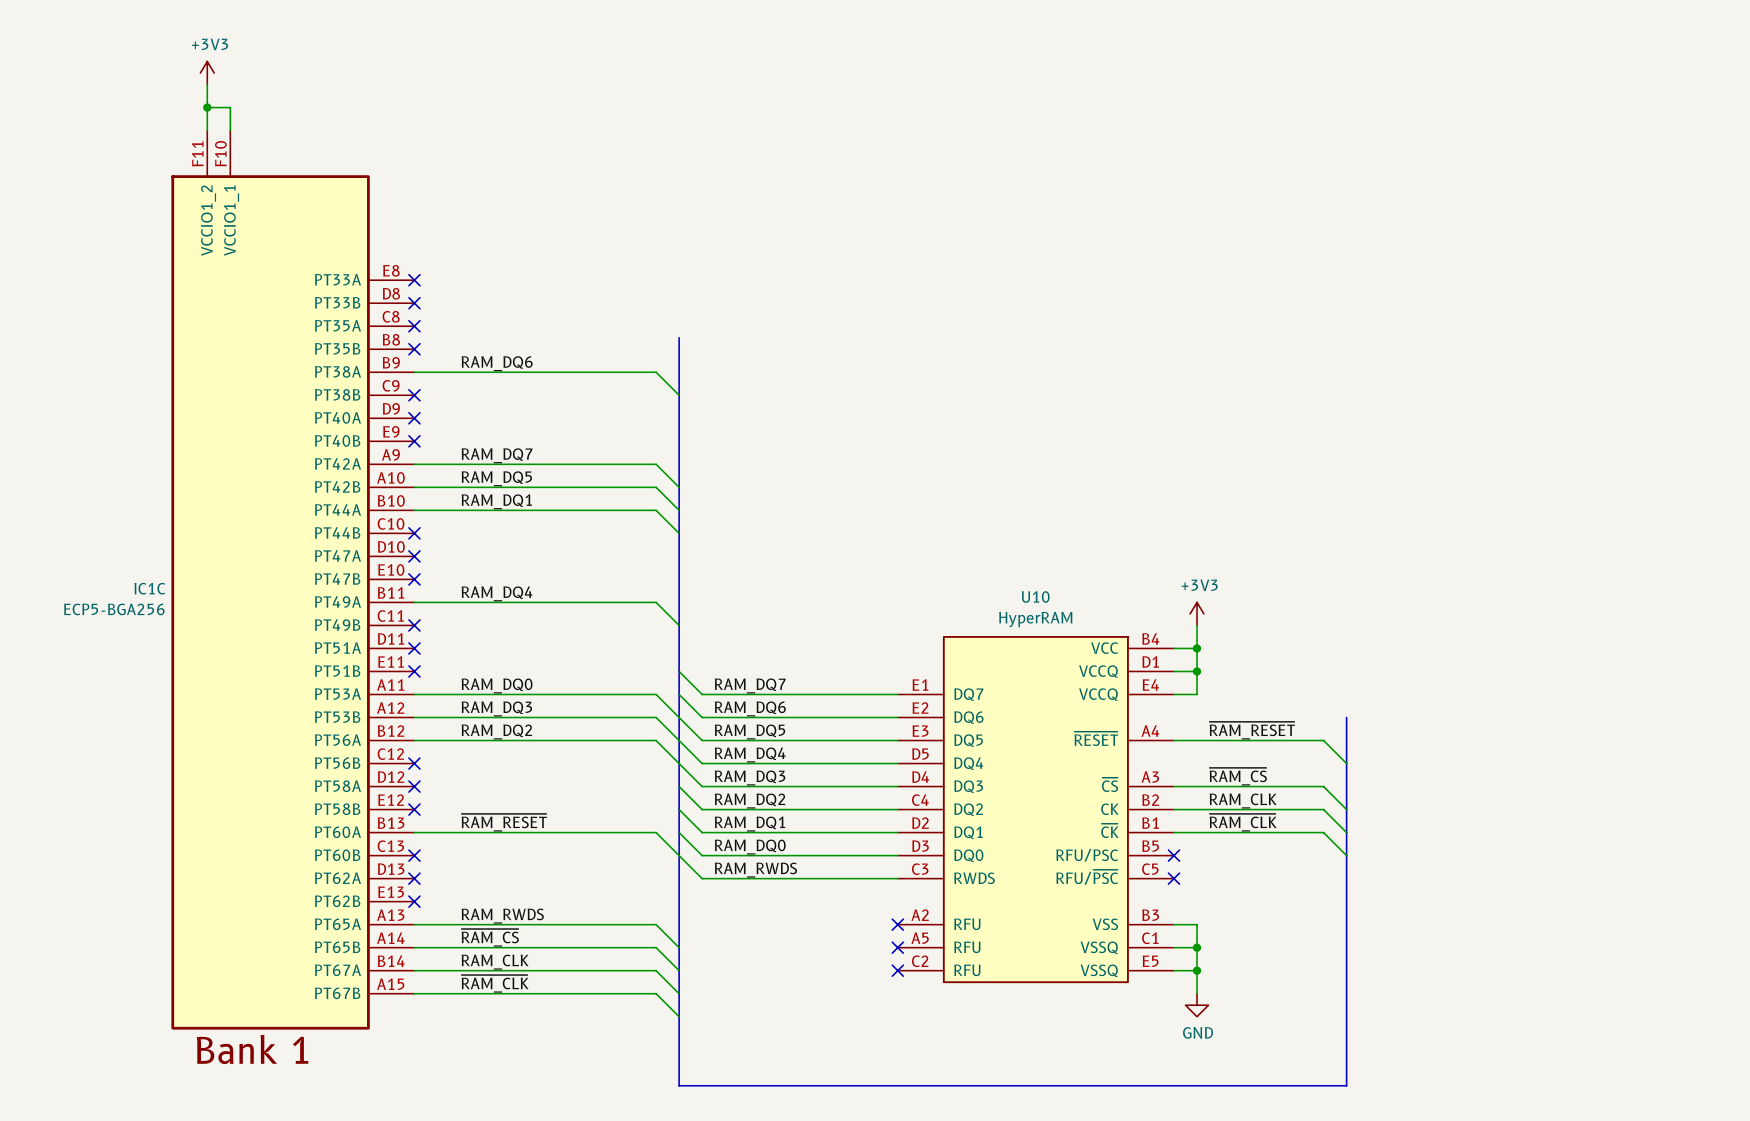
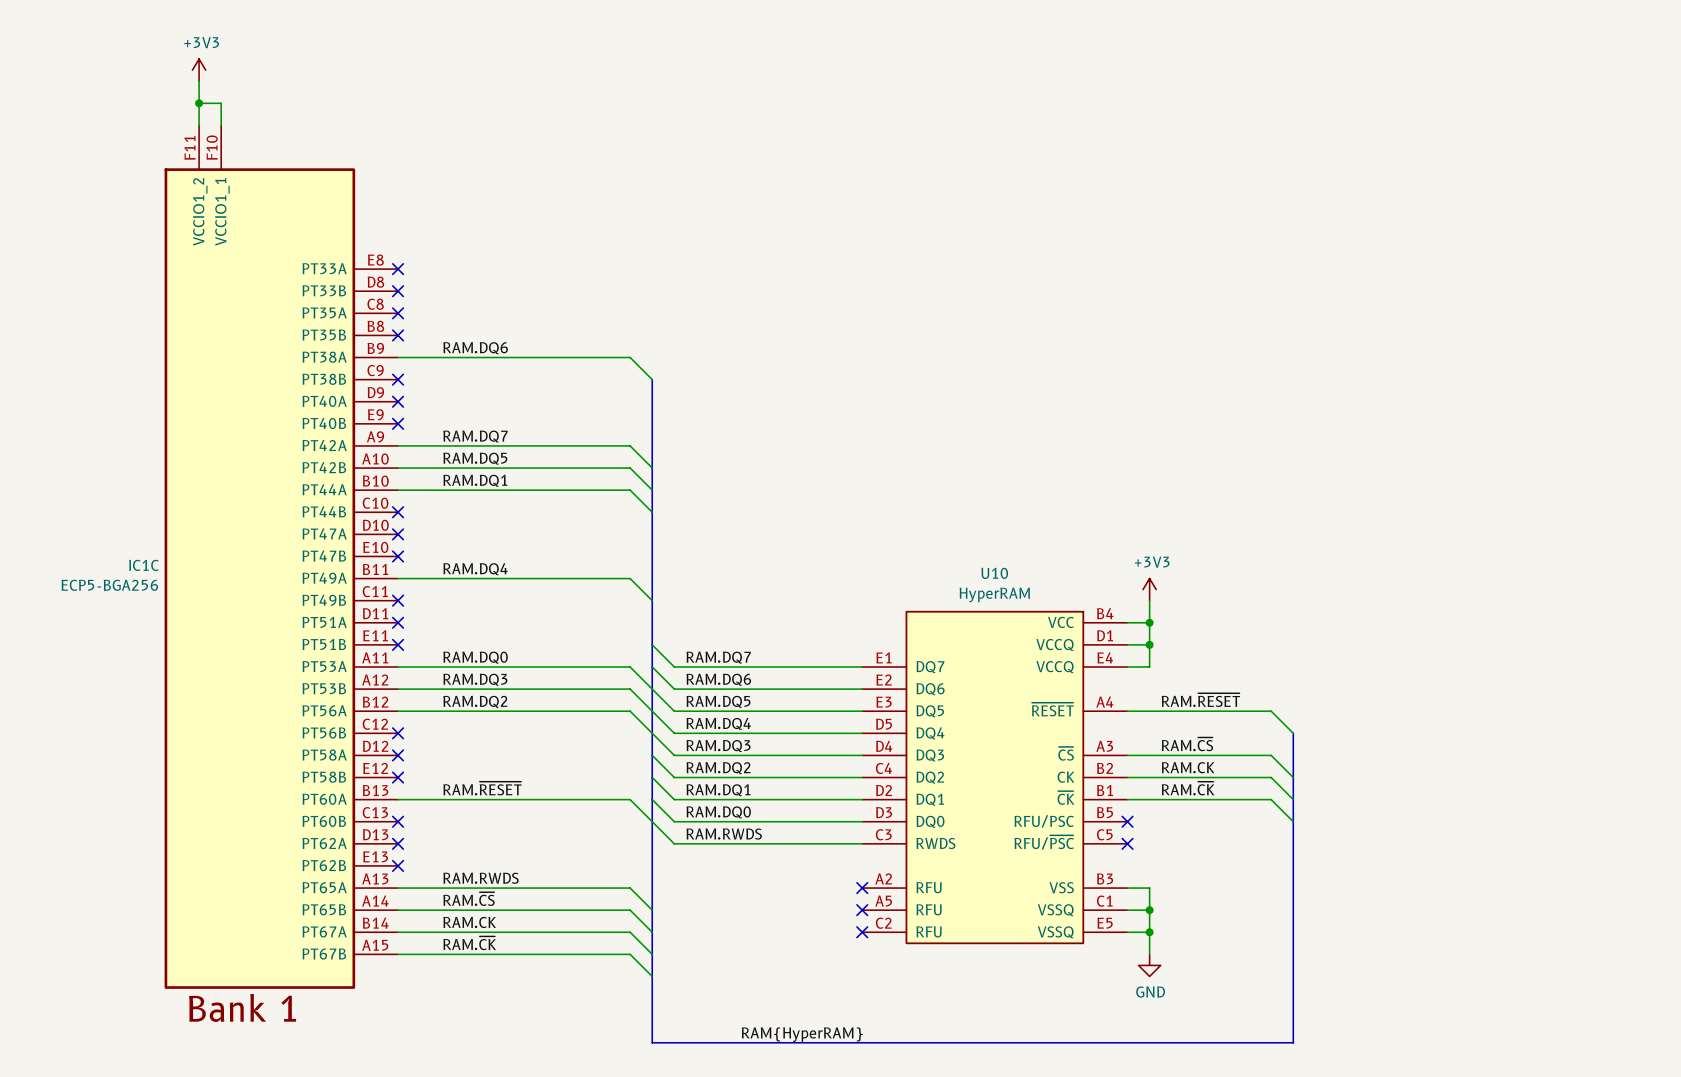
bus: (679, 337) (679, 395) -> none
label: RAM_DQ6 (497, 363) -> RAM.DQ6 (475, 348)
label: RAM_DQ7 (497, 455) -> RAM.DQ7 (475, 436)
label: RAM_DQ5 (496, 478) -> RAM.DQ5 (475, 458)
label: RAM_DQ1 (496, 501) -> RAM.DQ1 (475, 480)
label: RAM_DQ4 (497, 593) -> RAM.DQ4 (475, 569)
label: RAM_DQ0 (497, 685) -> RAM.DQ0 (475, 657)
label: RAM_DQ7 (750, 685) -> RAM.DQ7 (718, 657)
label: RAM_DQ3 (496, 708) -> RAM.DQ3 (475, 679)
label: RAM_DQ6 (750, 708) -> RAM.DQ6 (718, 679)
bus: (1346, 717) (1346, 763) -> none
label: ~{RAM_RESET} (1252, 730) -> RAM.~{RESET} (1200, 700)
label: RAM_DQ2 (496, 731) -> RAM.DQ2 (475, 701)
label: RAM_DQ5 (750, 731) -> RAM.DQ5 (718, 701)
label: RAM_DQ4 (750, 754) -> RAM.DQ4 (718, 723)
label: ~{RAM_CS} (1238, 776) -> RAM.~{CS} (1187, 744)
label: RAM_DQ3 (750, 778) -> RAM.DQ3 (718, 746)
label: RAM_DQ2 (750, 801) -> RAM.DQ2 (718, 768)
label: RAM_CLK (1243, 801) -> RAM.CK (1188, 767)
label: ~{RAM_RESET} (504, 822) -> RAM.~{RESET} (482, 788)
label: ~{RAM_CLK} (1243, 822) -> RAM.~{CK} (1188, 788)
label: RAM_DQ1 (750, 824) -> RAM.DQ1 (718, 790)
label: RAM_DQ0 (750, 847) -> RAM.DQ0 (718, 812)
label: RAM_RWDS (755, 870) -> RAM.RWDS (724, 834)
label: RAM_RWDS (502, 916) -> RAM.RWDS (481, 878)
label: ~{RAM_CS} (490, 937) -> RAM.~{CS} (469, 899)
label: RAM_CLK (495, 962) -> RAM.CK (469, 922)
label: ~{RAM_CLK} (495, 983) -> RAM.~{CK} (469, 943)
label: none -> RAM{HyperRAM} (802, 1034)

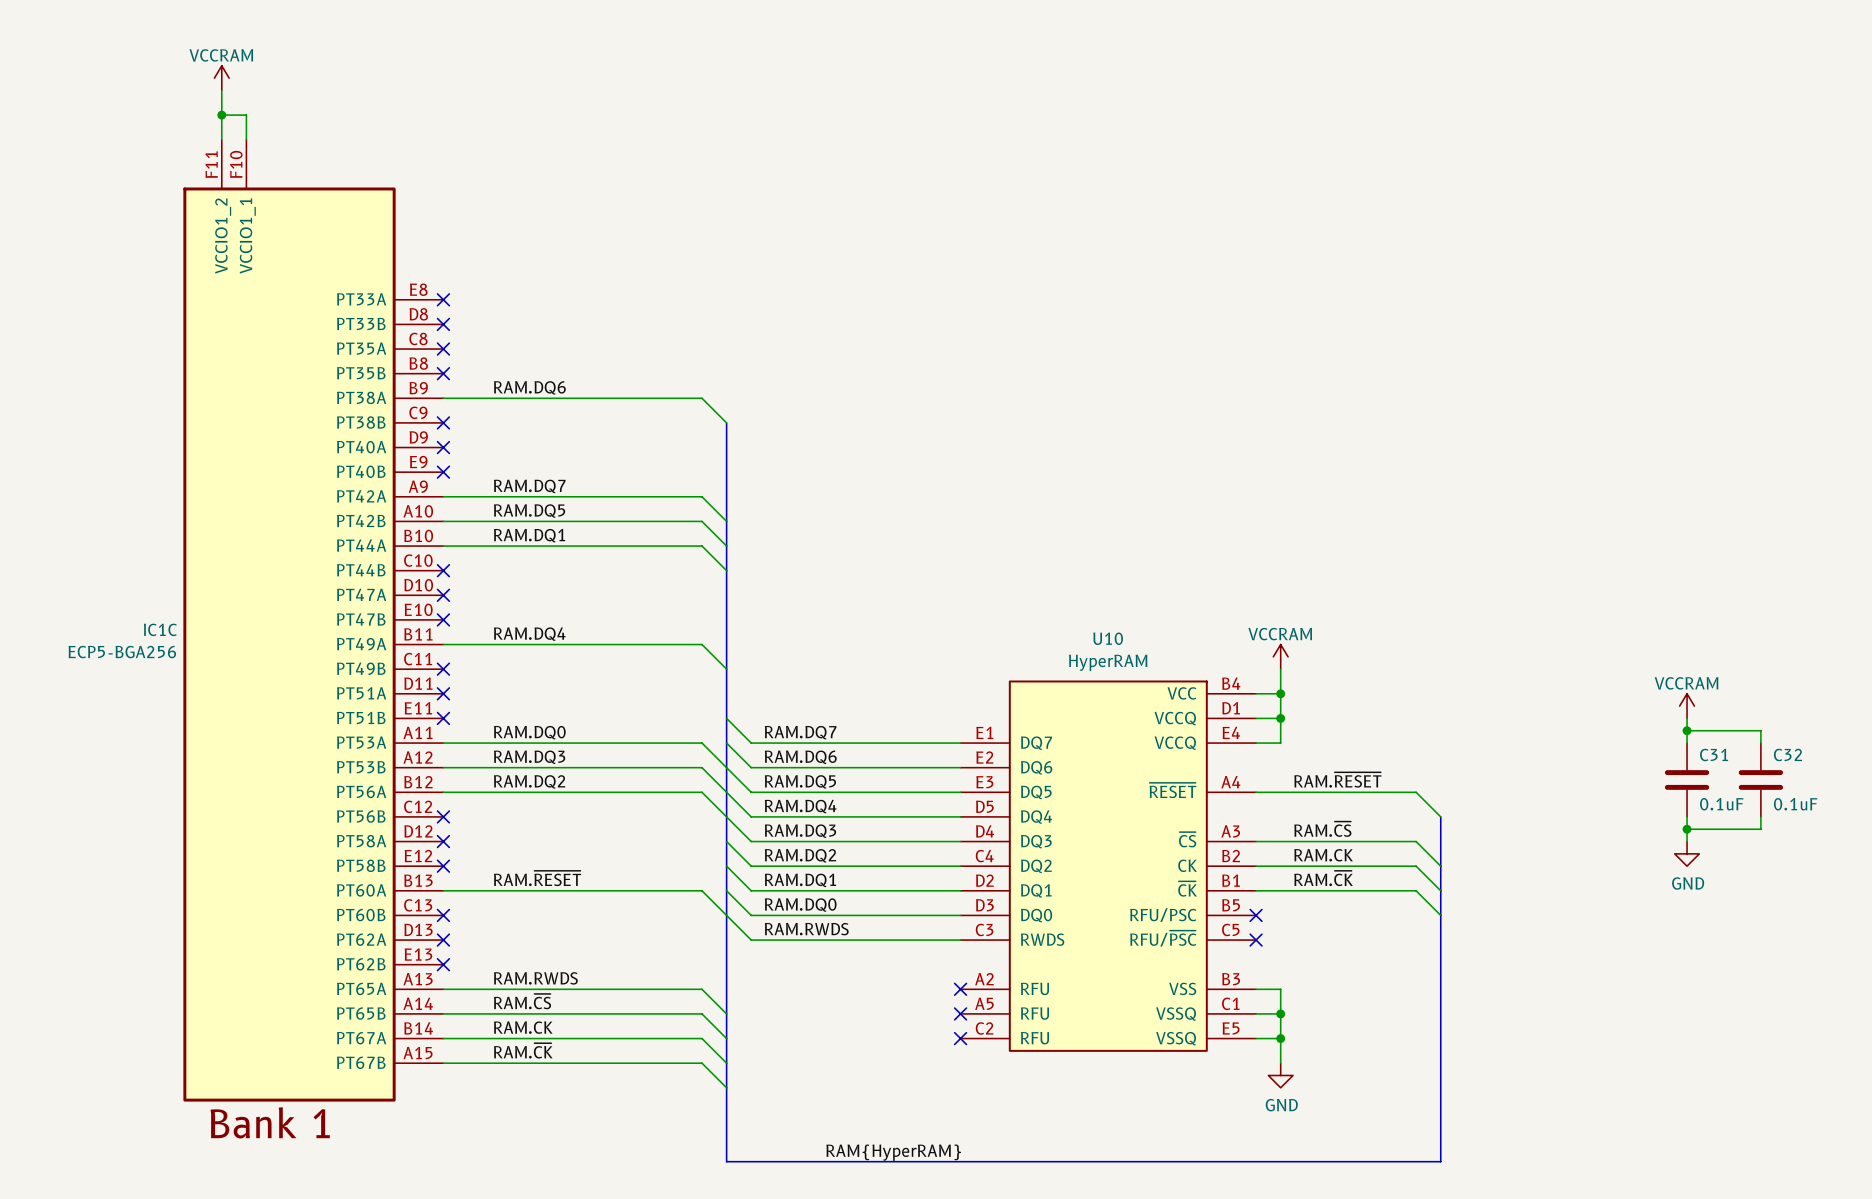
power symbol: +3V3 (199, 70) -> VCCRAM (221, 78)
power symbol: +3V3 (1149, 589) -> VCCRAM (1280, 656)
power symbol: none -> VCCRAM (1687, 706)
wire: none -> (1687, 718) (1687, 743)
wire: none -> (1687, 730) (1760, 730) (1760, 743)
junction: none -> (1687, 730)
C31: none -> 0.1uF (1687, 779)
C32: none -> 0.1uF (1760, 779)
wire: none -> (1687, 816) (1687, 841)
wire: none -> (1760, 816) (1760, 829) (1687, 829)
junction: none -> (1687, 829)
power symbol: none -> GND (1687, 853)

